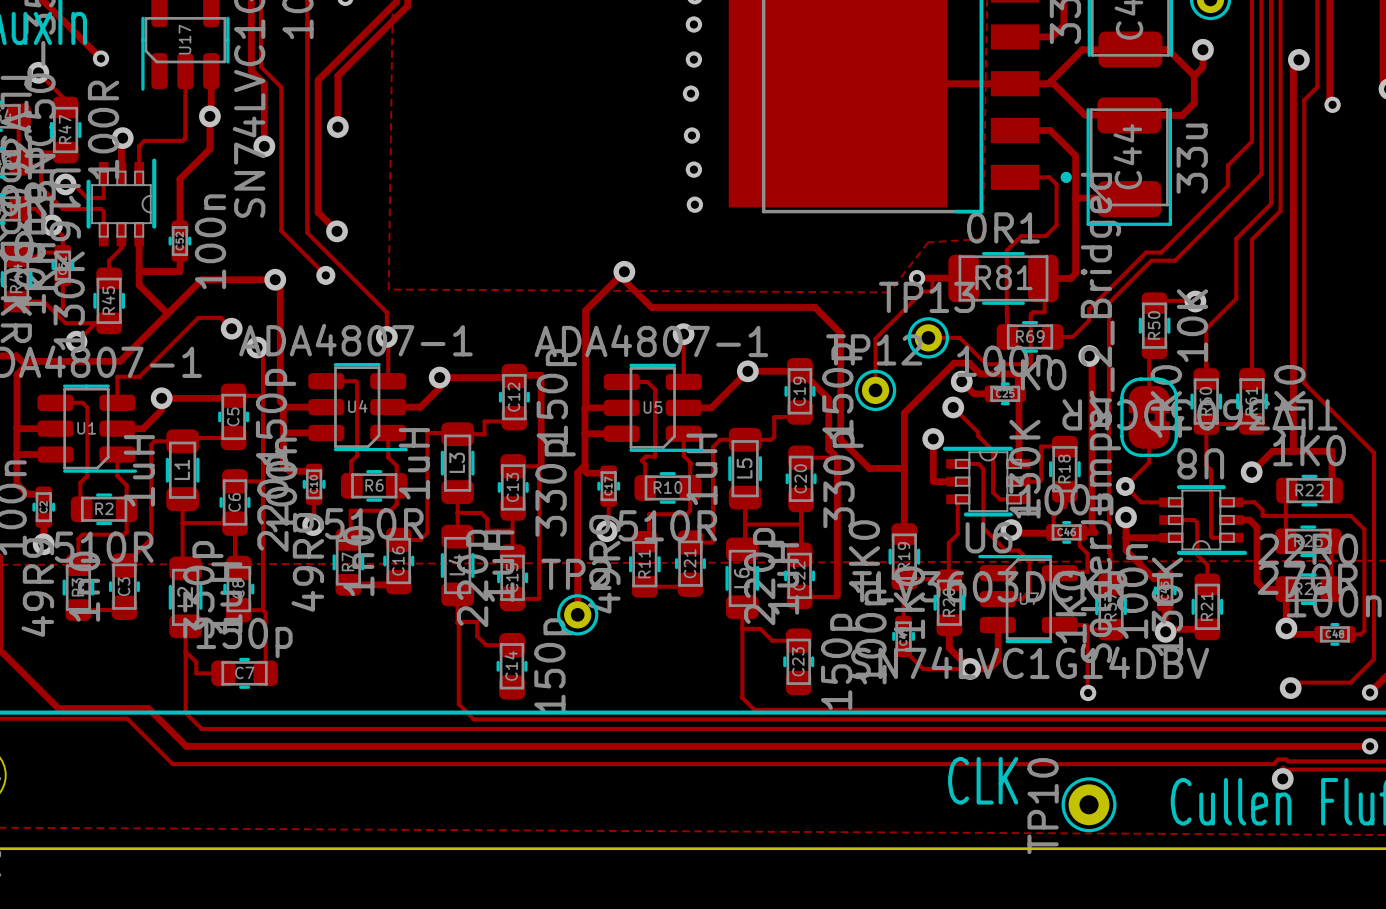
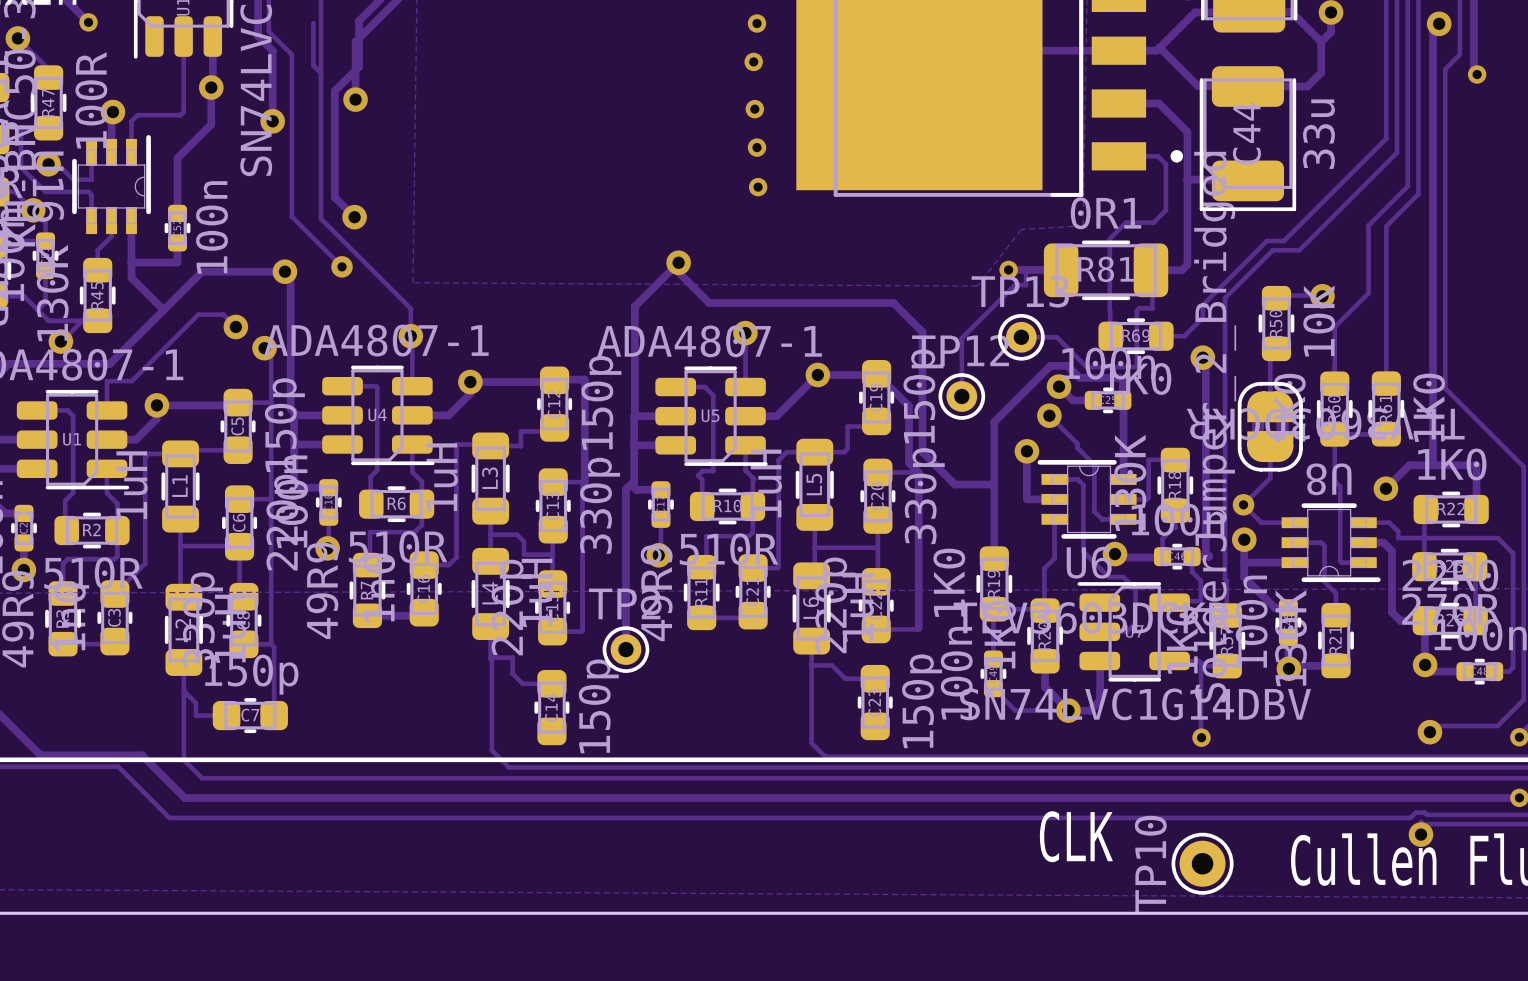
track: (340, 57) (318, 80) (319, 213) -> (359, 20) (359, 66) (334, 91) (334, 197)
track: none -> (313, 22) (313, 65) (321, 73)
track: (1251, 141) (1228, 165) (1228, 185) -> (1386, 115) (1386, 138) (1359, 165)

